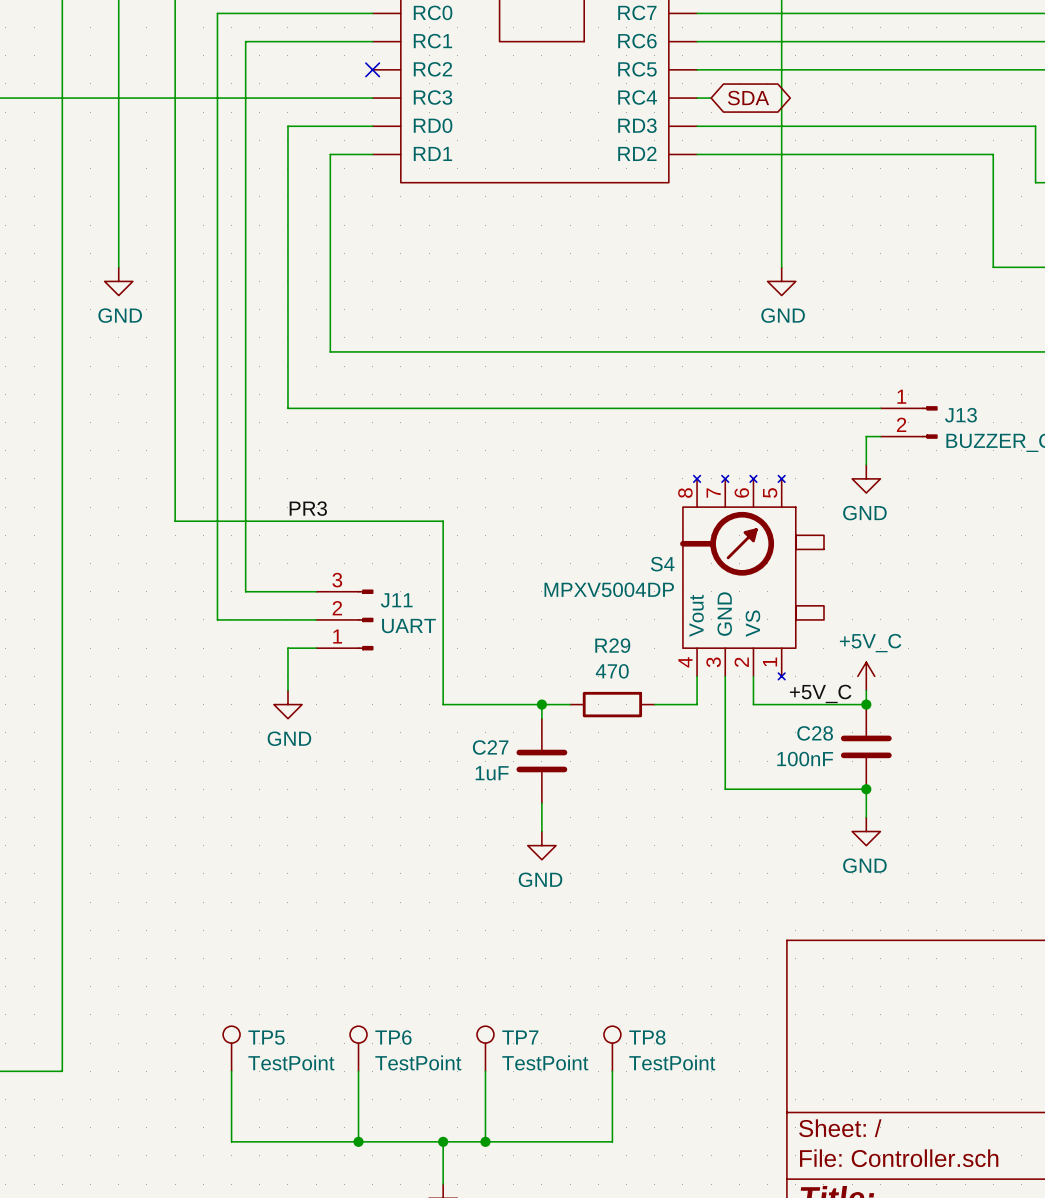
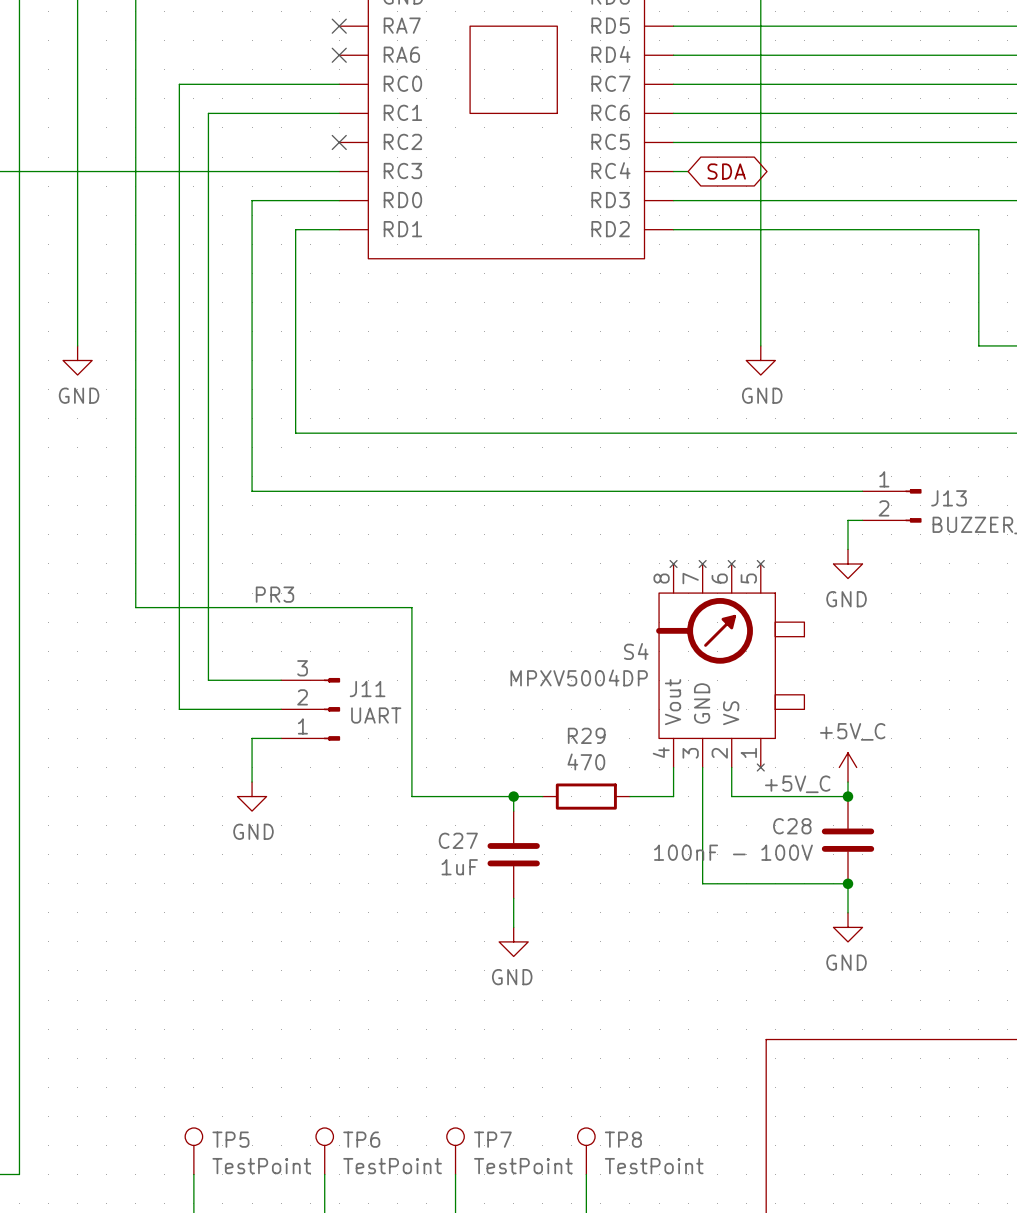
C28 value: 100nF (805, 759) -> 100nF - 100V (733, 852)

